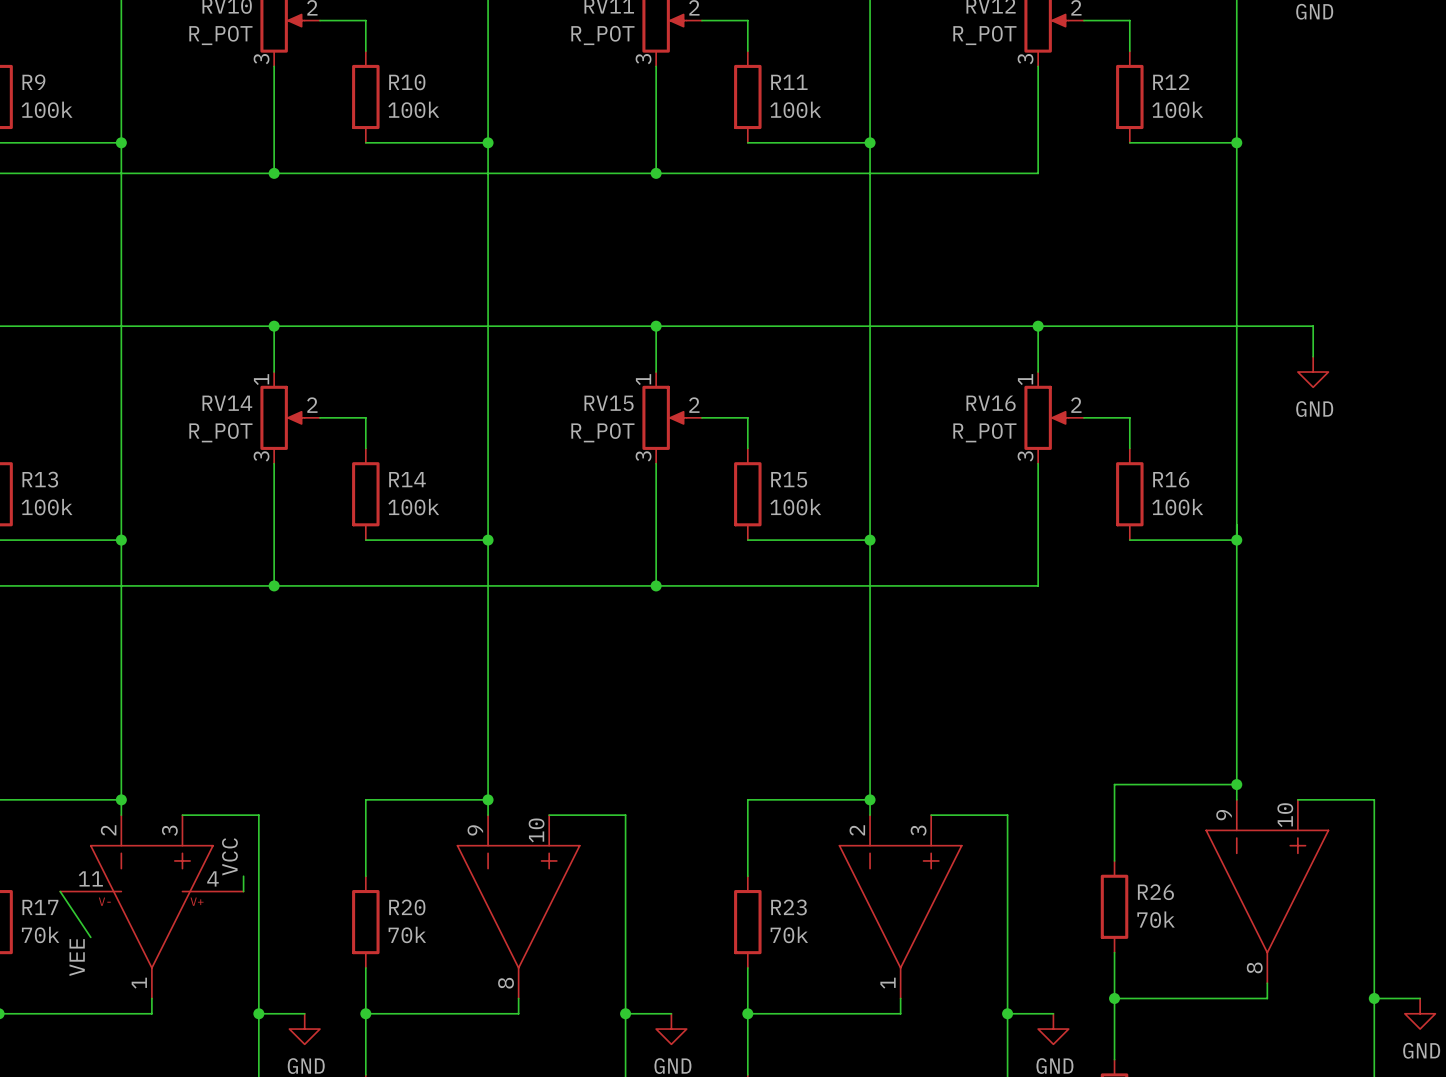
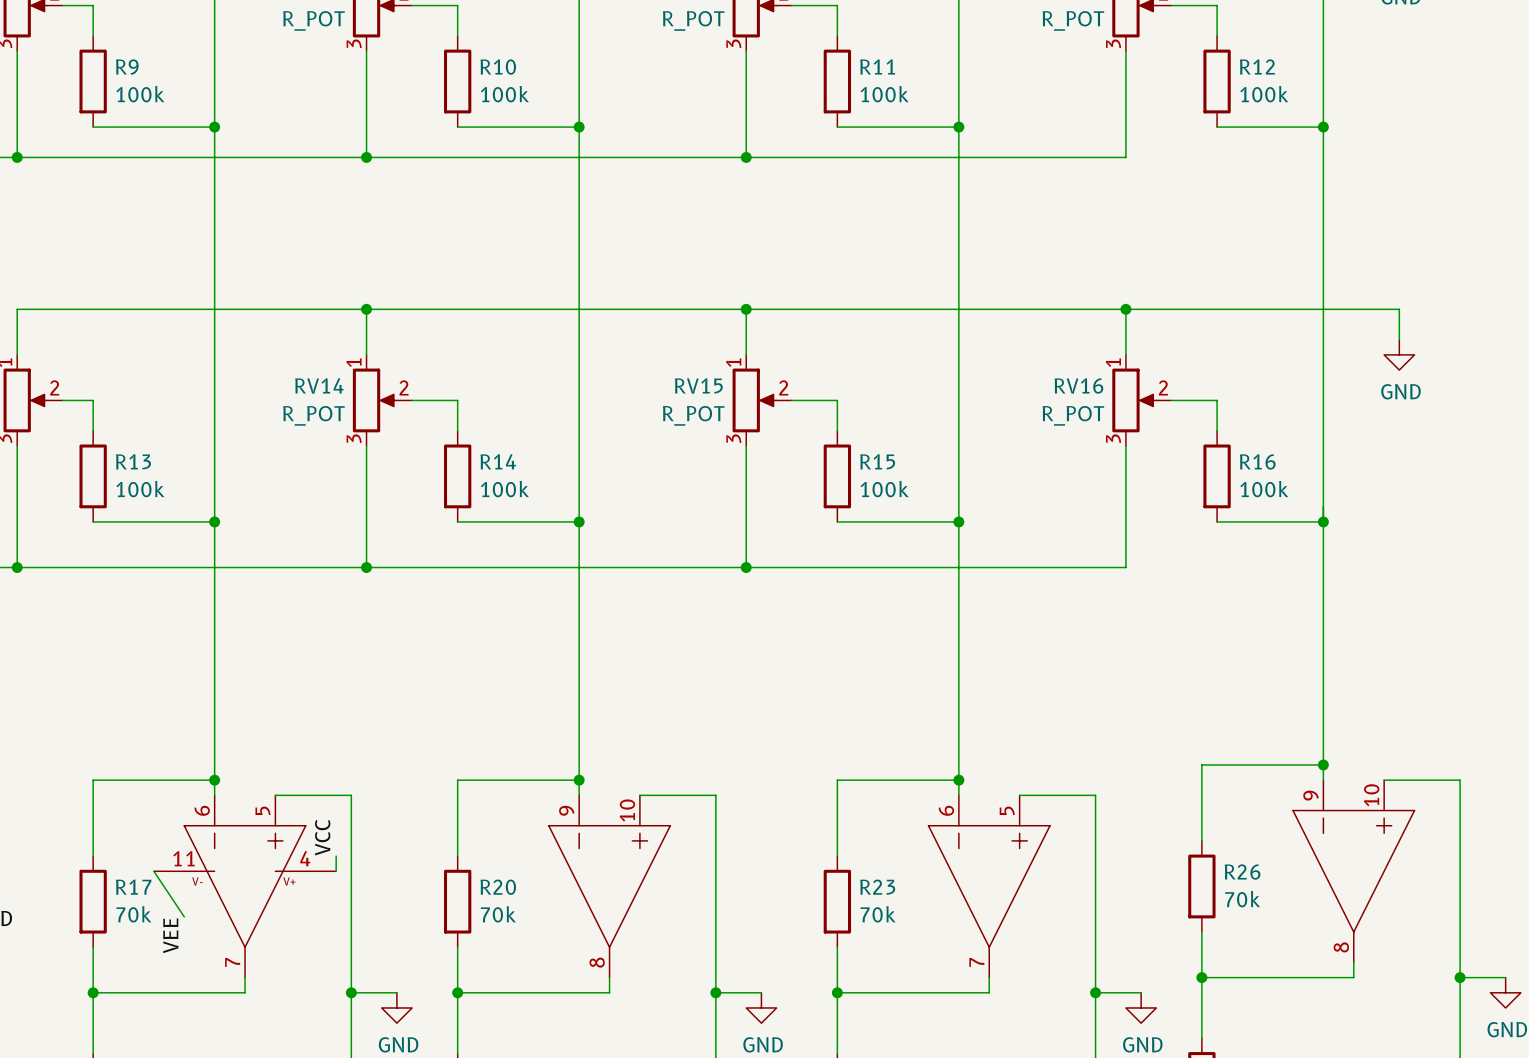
part pin number: 2 (108, 830) -> 6 (202, 810)
part pin number: 3 (169, 830) -> 5 (262, 810)
part pin number: 2 (857, 830) -> 6 (946, 810)
part pin number: 3 (918, 830) -> 5 (1007, 810)
part pin number: 1 (139, 983) -> 7 (232, 962)
part pin number: 1 (888, 983) -> 7 (976, 962)

